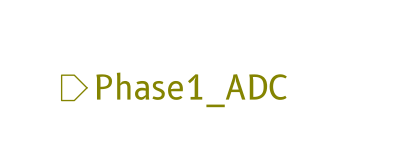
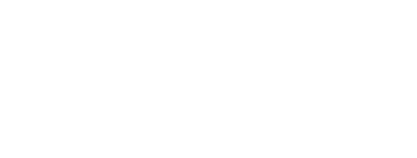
hierarchical label: Phase1_ADC (191, 89) -> none

